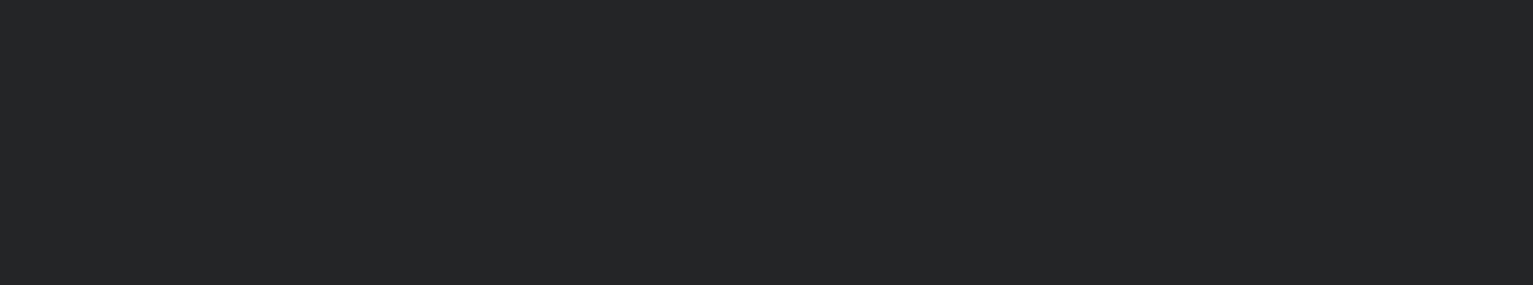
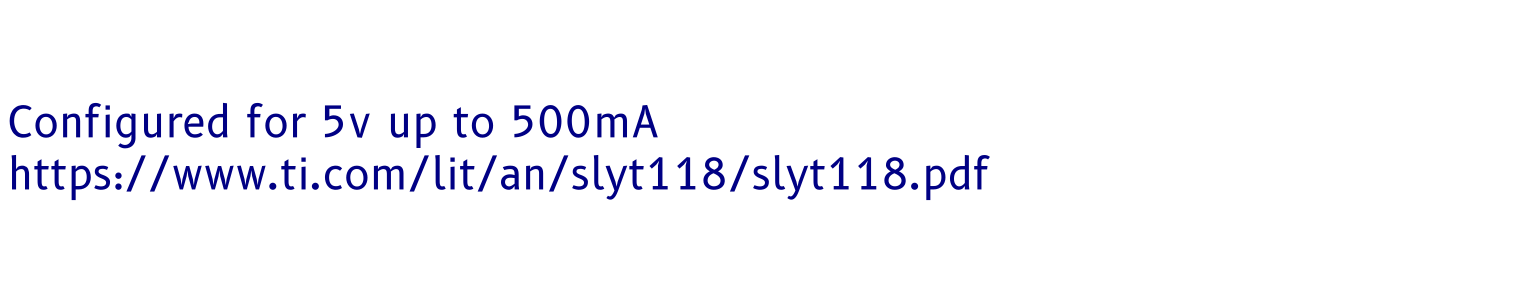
text: none -> Configured for 5v up to 500mA (333, 125)
text: none -> https://www.ti.com/lit/an/slyt118/slyt118.pdf (500, 177)

